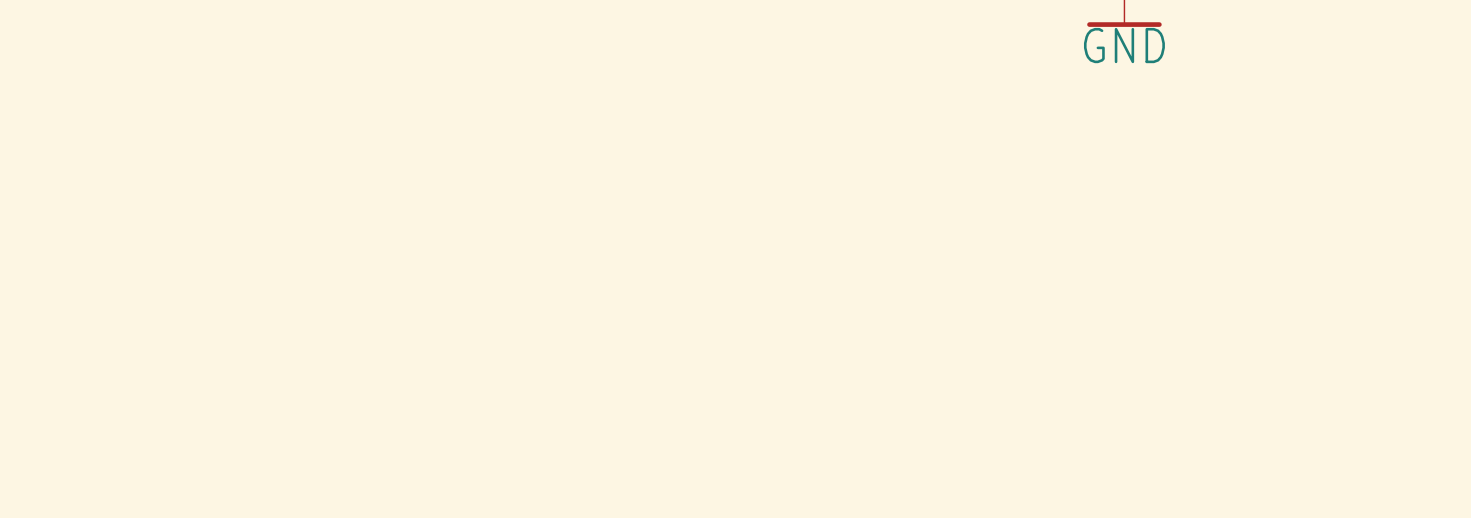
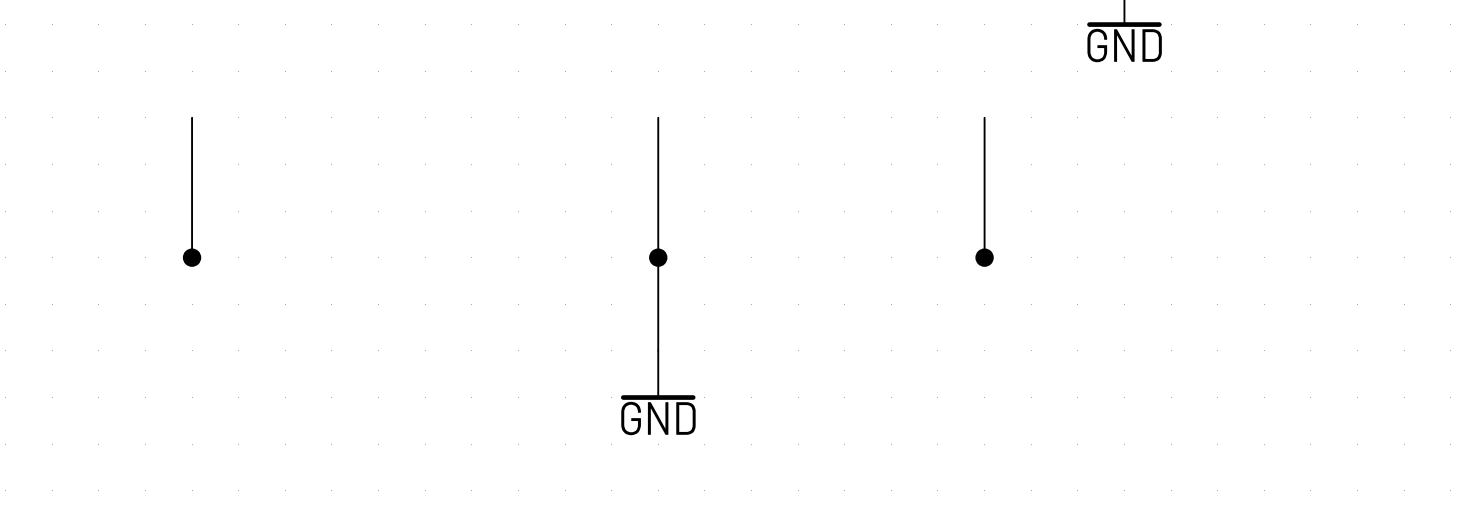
wire: none -> (192, 117) (192, 257)
wire: none -> (658, 117) (658, 350)
wire: none -> (984, 117) (984, 257)
junction: none -> (192, 257)
junction: none -> (658, 257)
junction: none -> (984, 257)
power symbol: none -> GND (658, 375)

